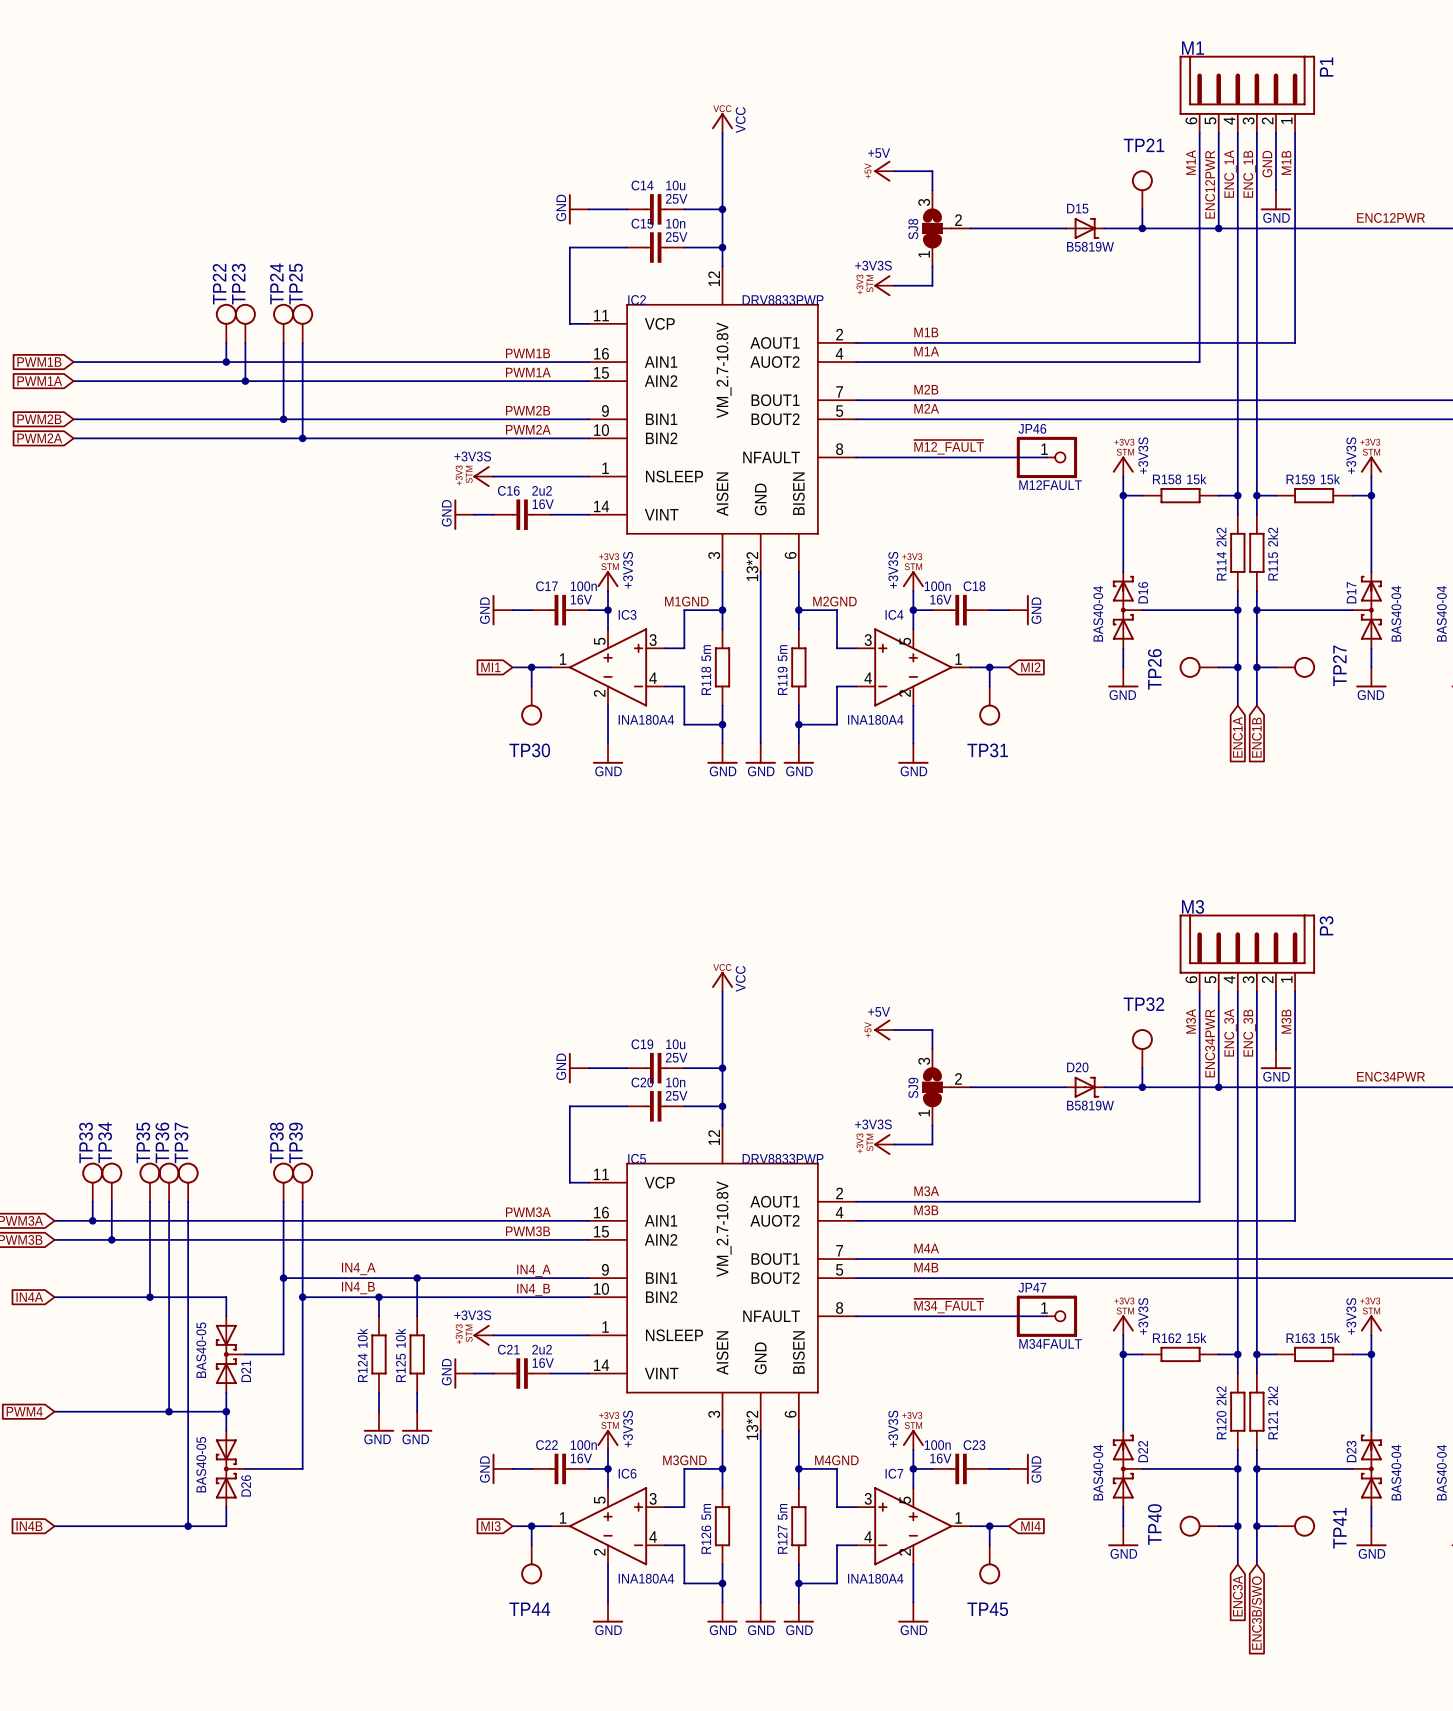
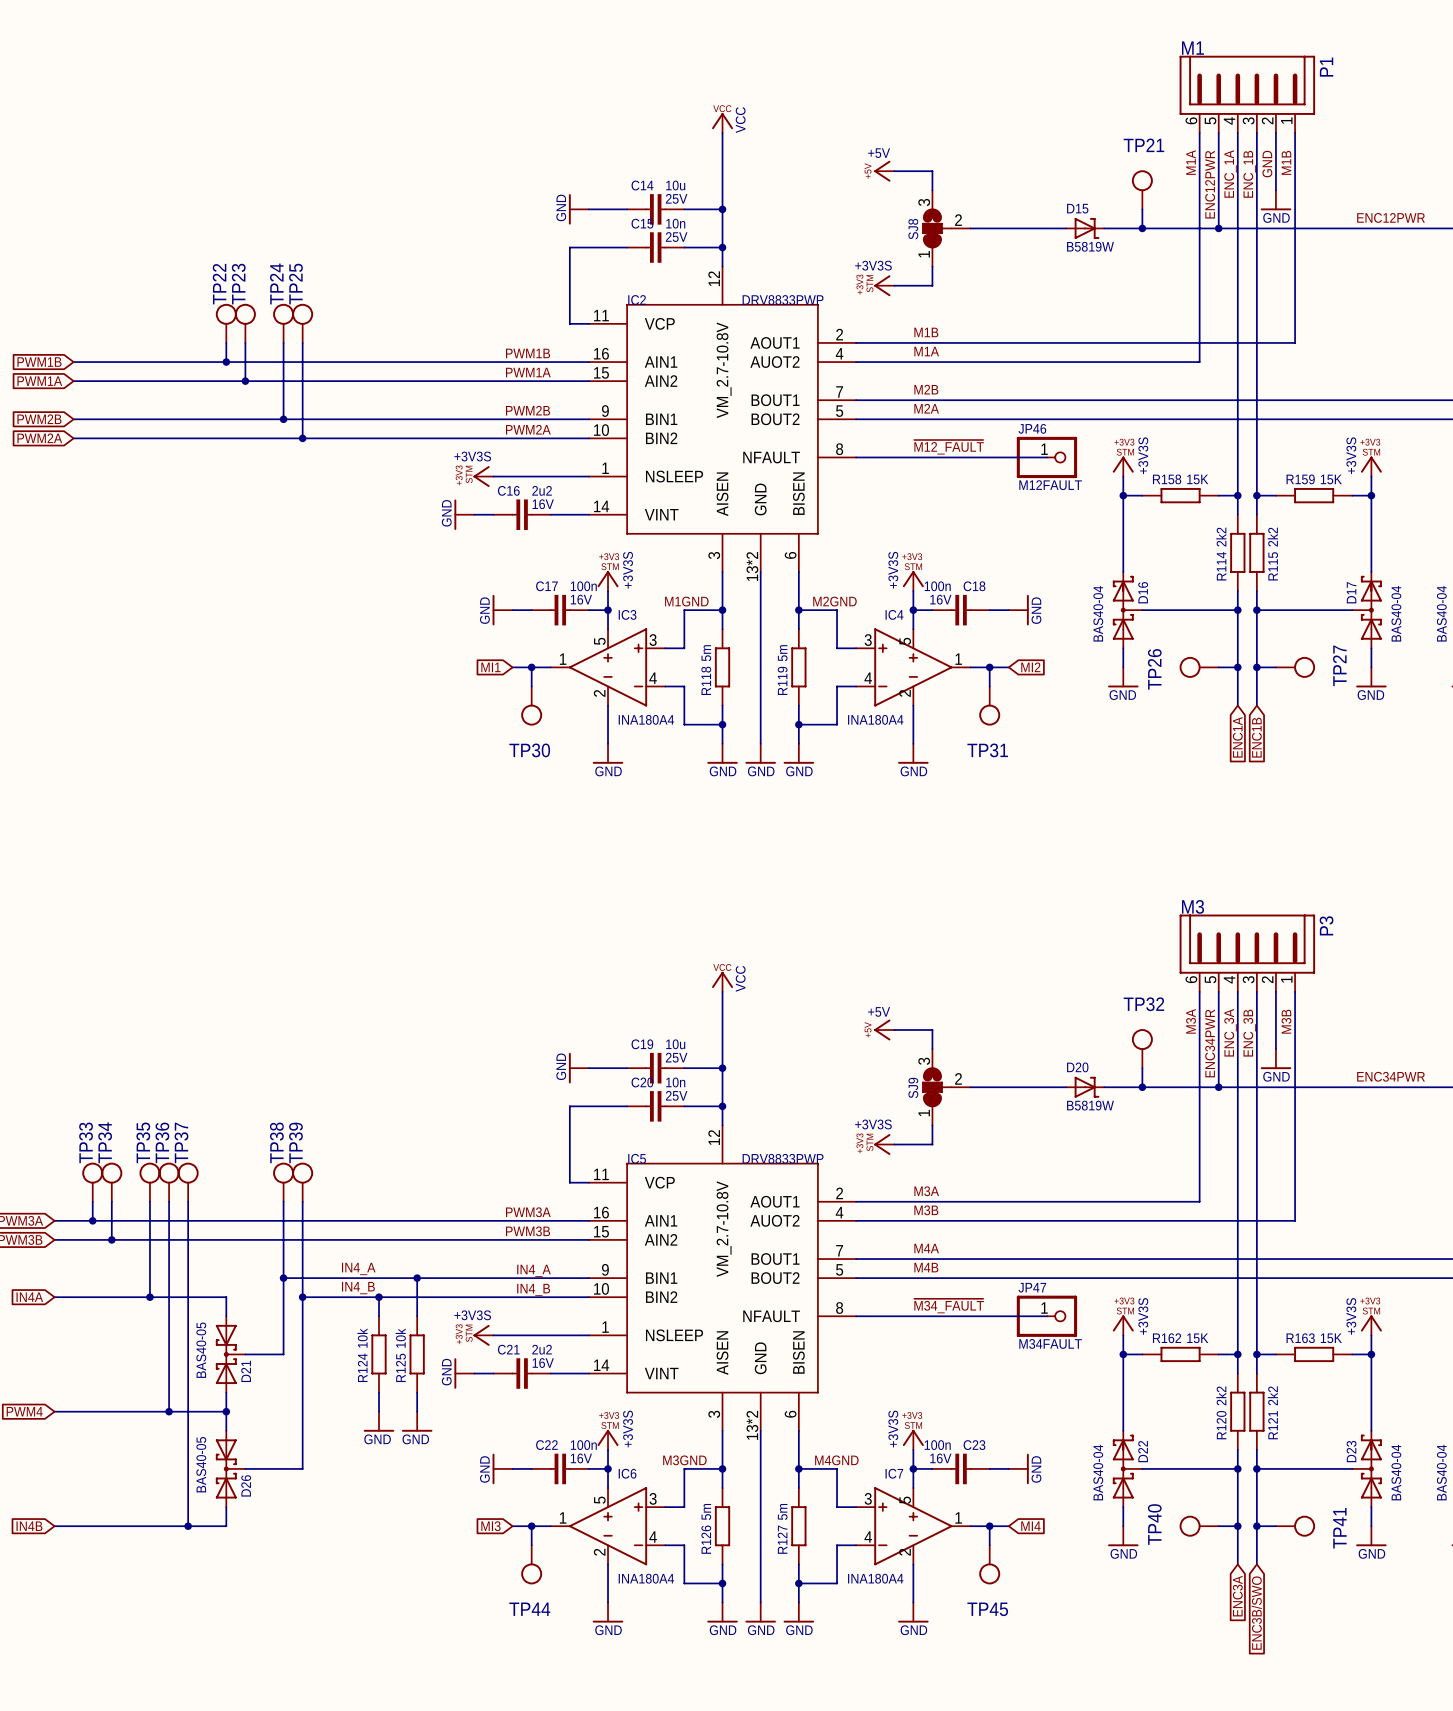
R158 value: 15k (1196, 479) -> 15K (1197, 479)
R159 value: 15k (1330, 479) -> 15K (1331, 479)
R162 value: 15k (1196, 1338) -> 15K (1197, 1338)
R163 value: 15k (1330, 1338) -> 15K (1331, 1338)

